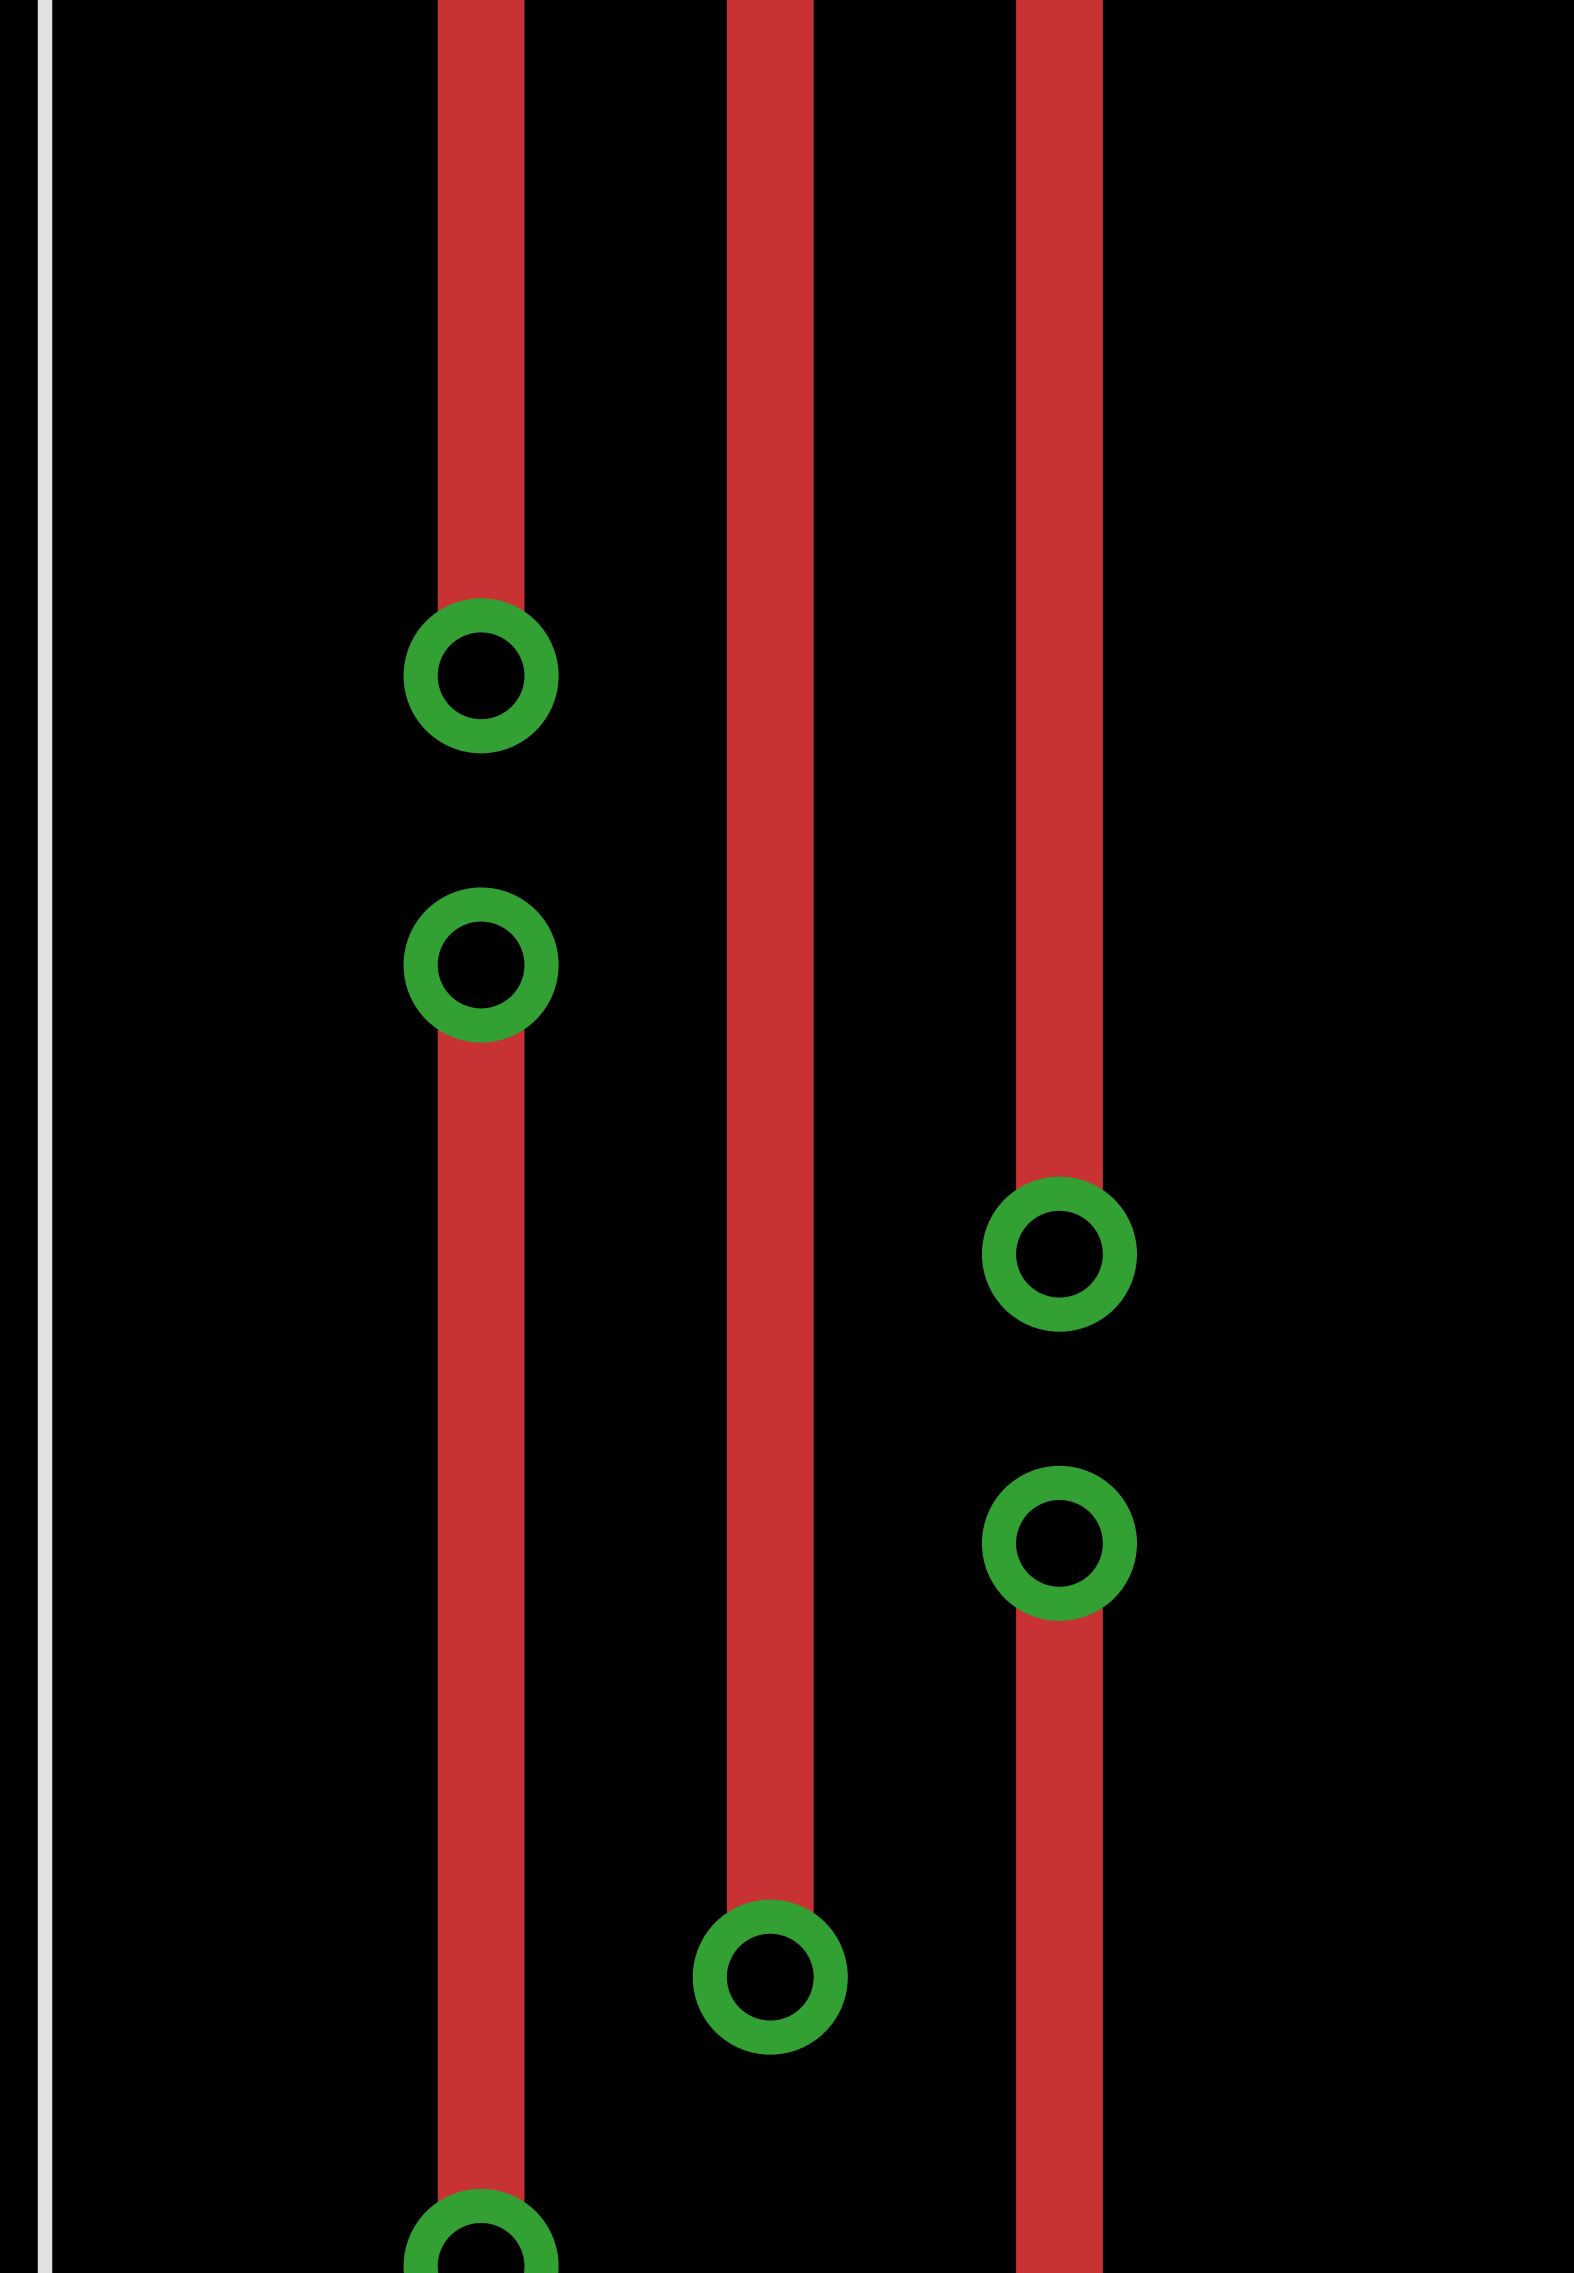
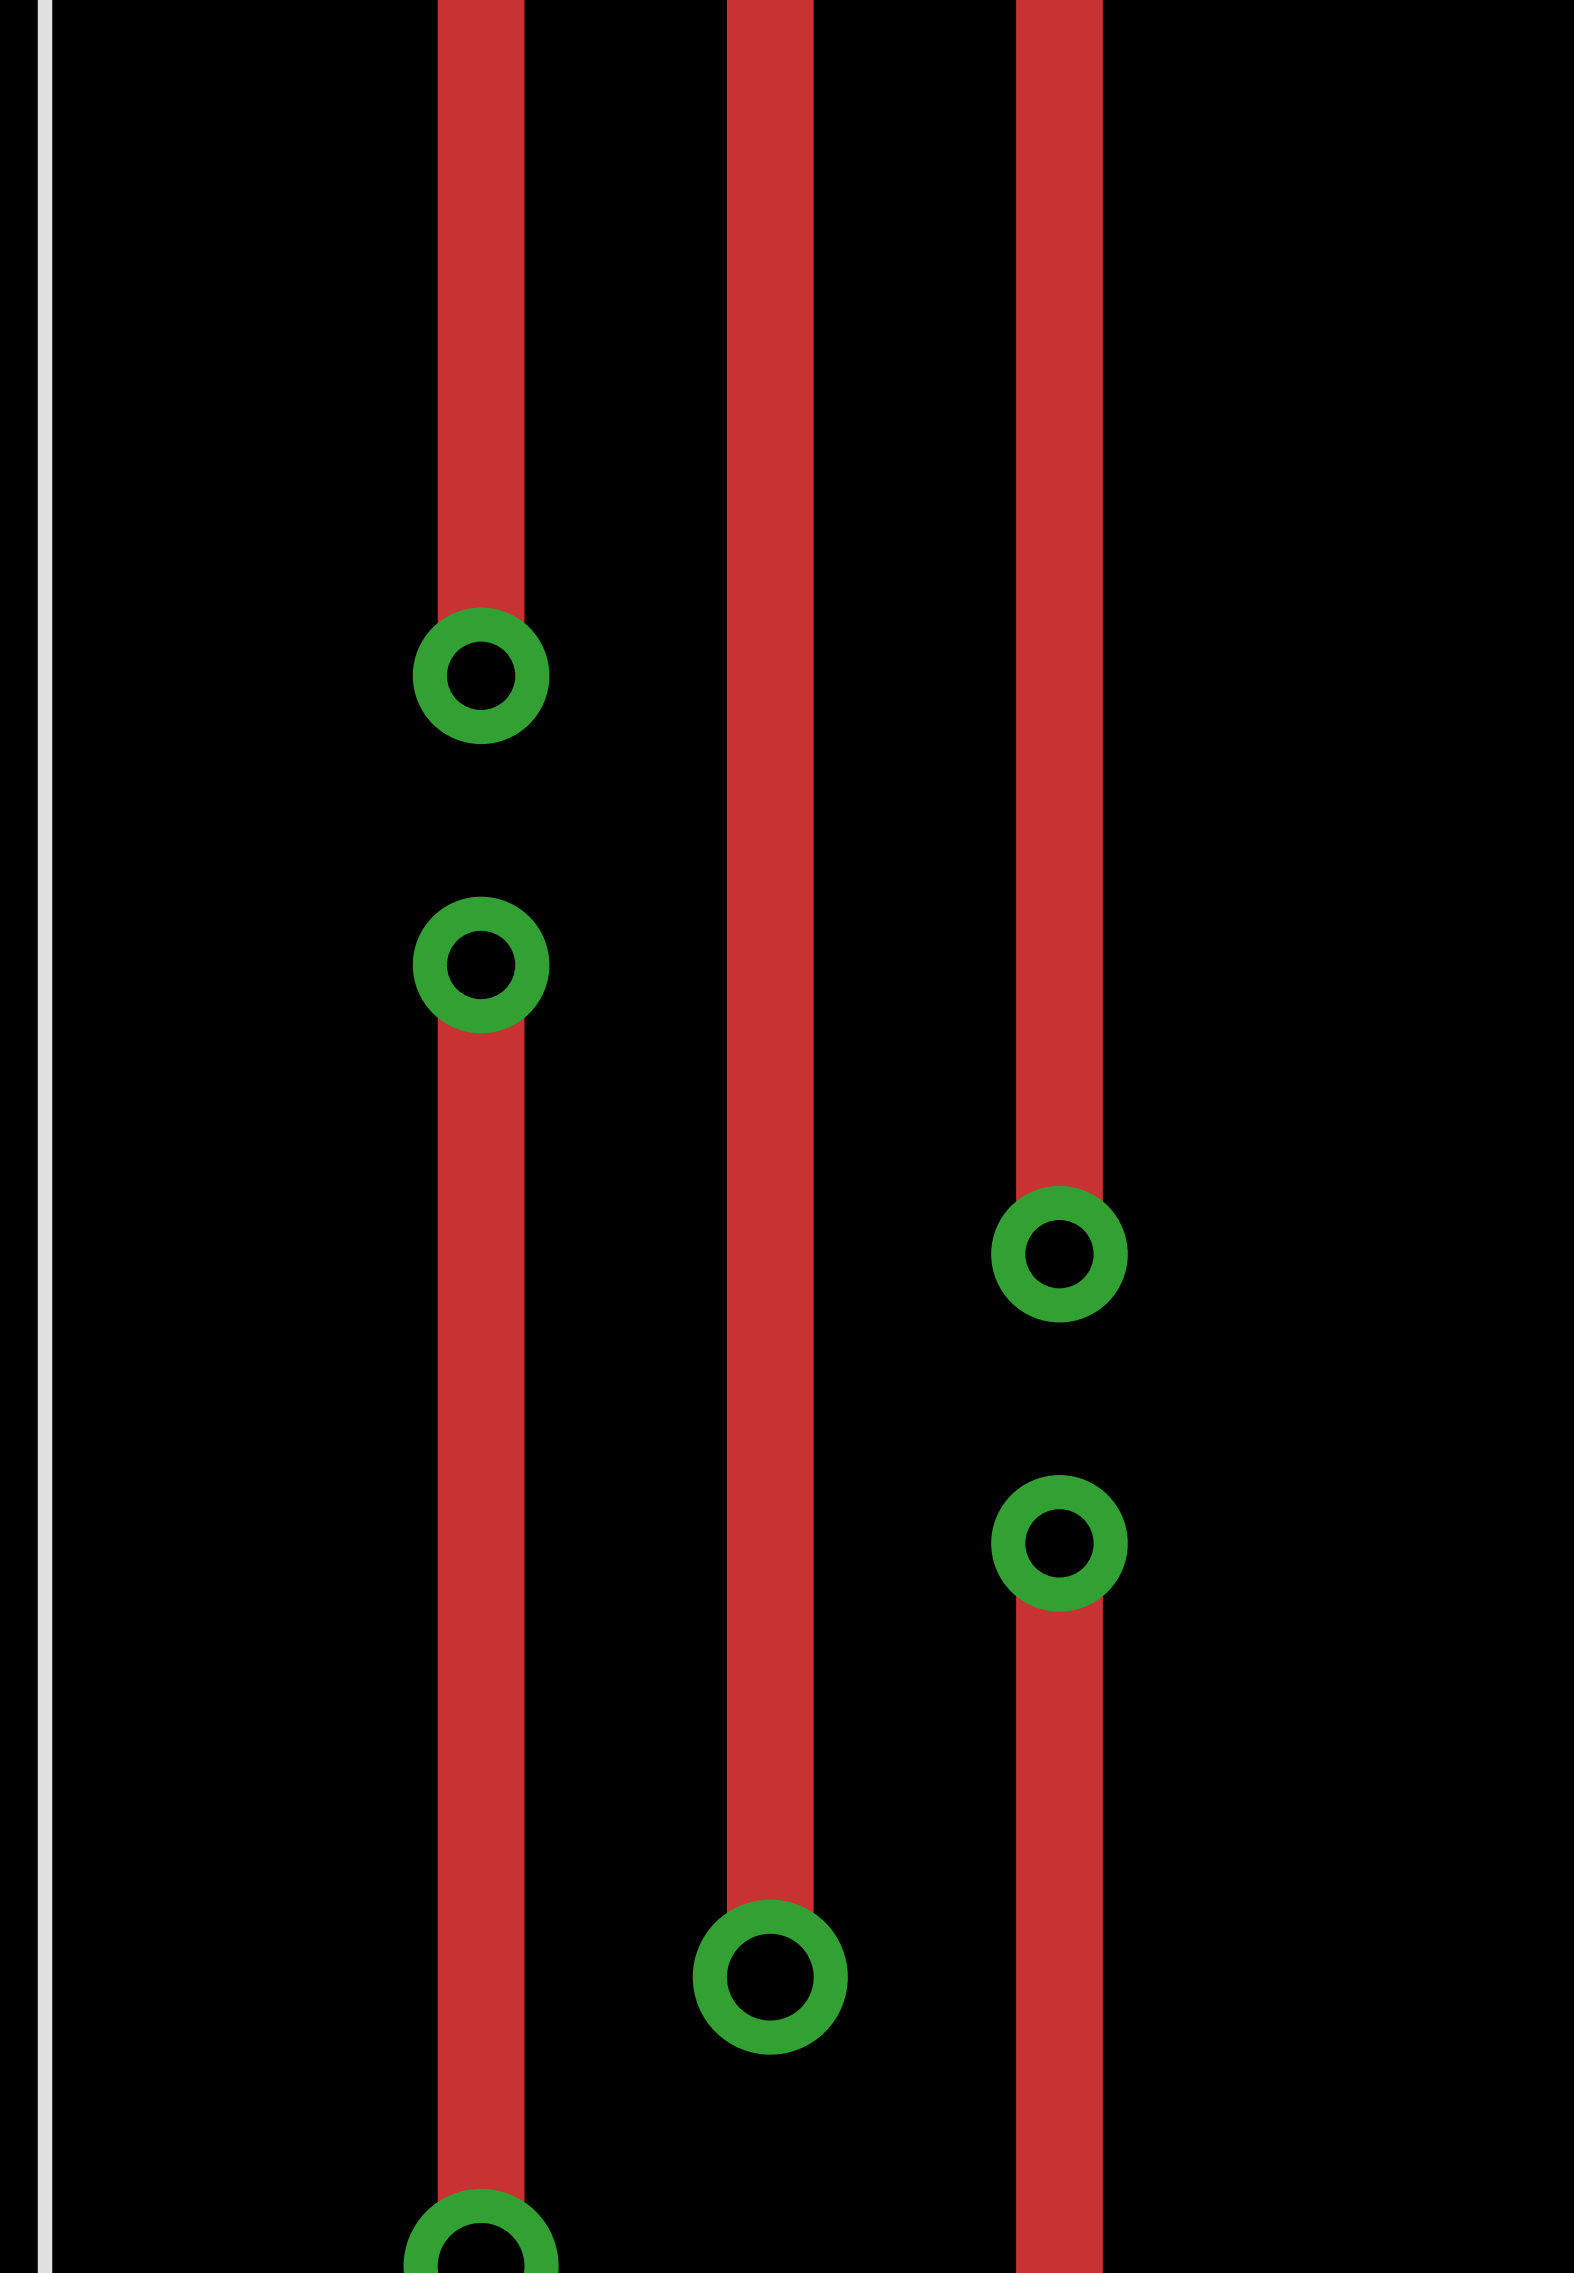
via size: [403, 598, 559, 754] -> [412, 607, 550, 745]
via size: [403, 887, 559, 1043] -> [412, 896, 550, 1034]
via size: [981, 1176, 1138, 1332] -> [991, 1185, 1128, 1323]
via size: [981, 1465, 1138, 1621] -> [991, 1475, 1128, 1612]

